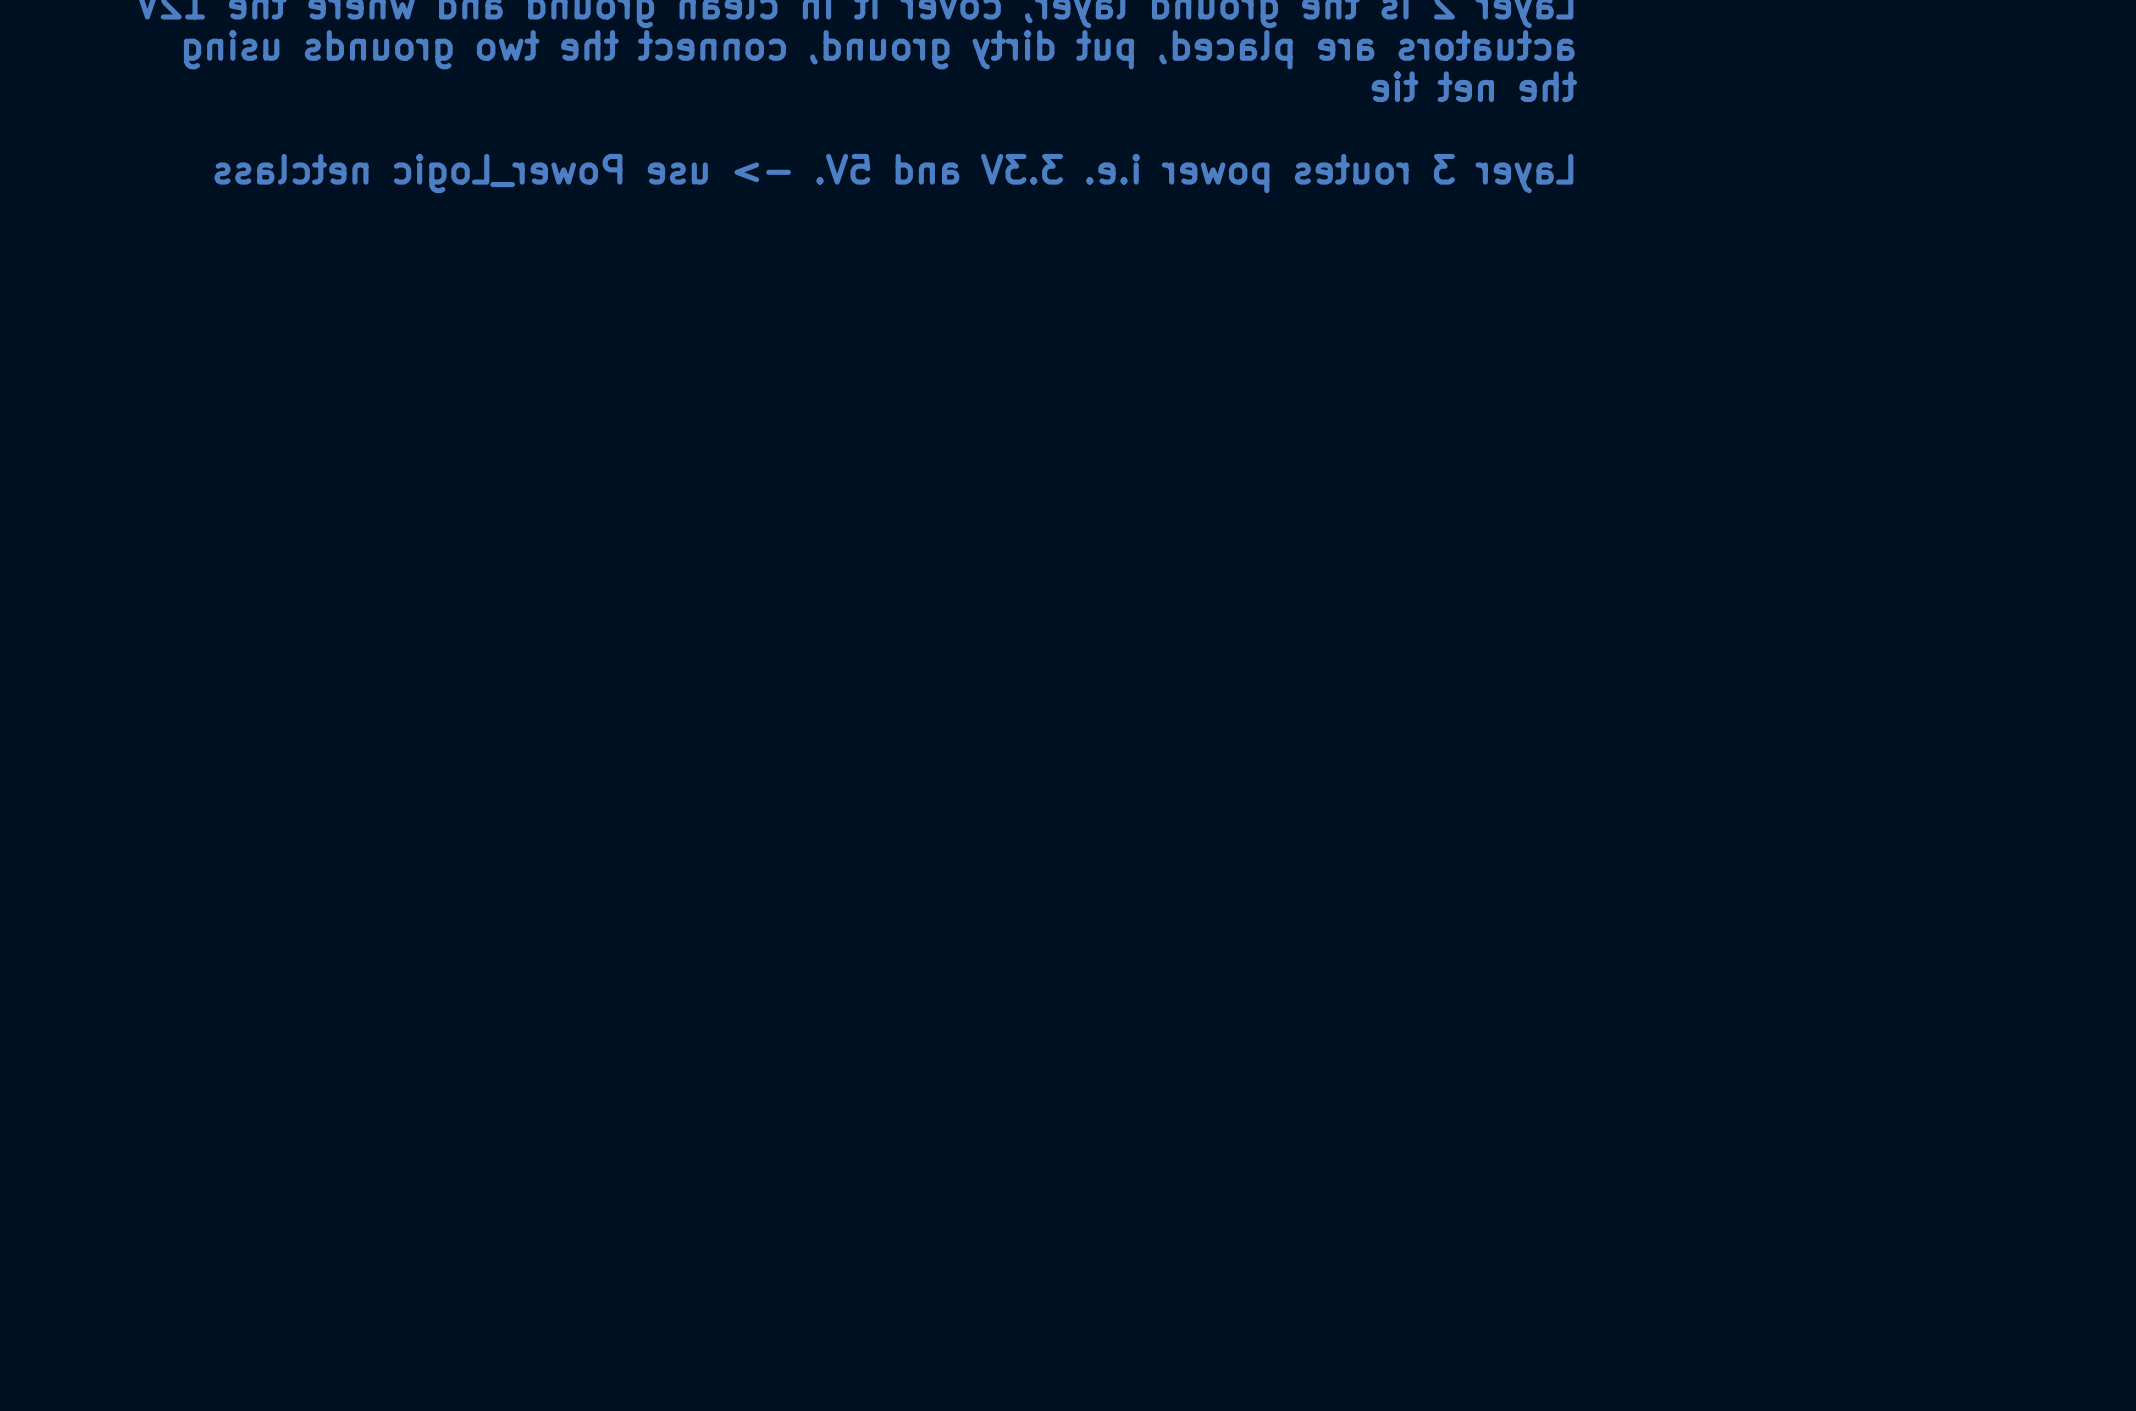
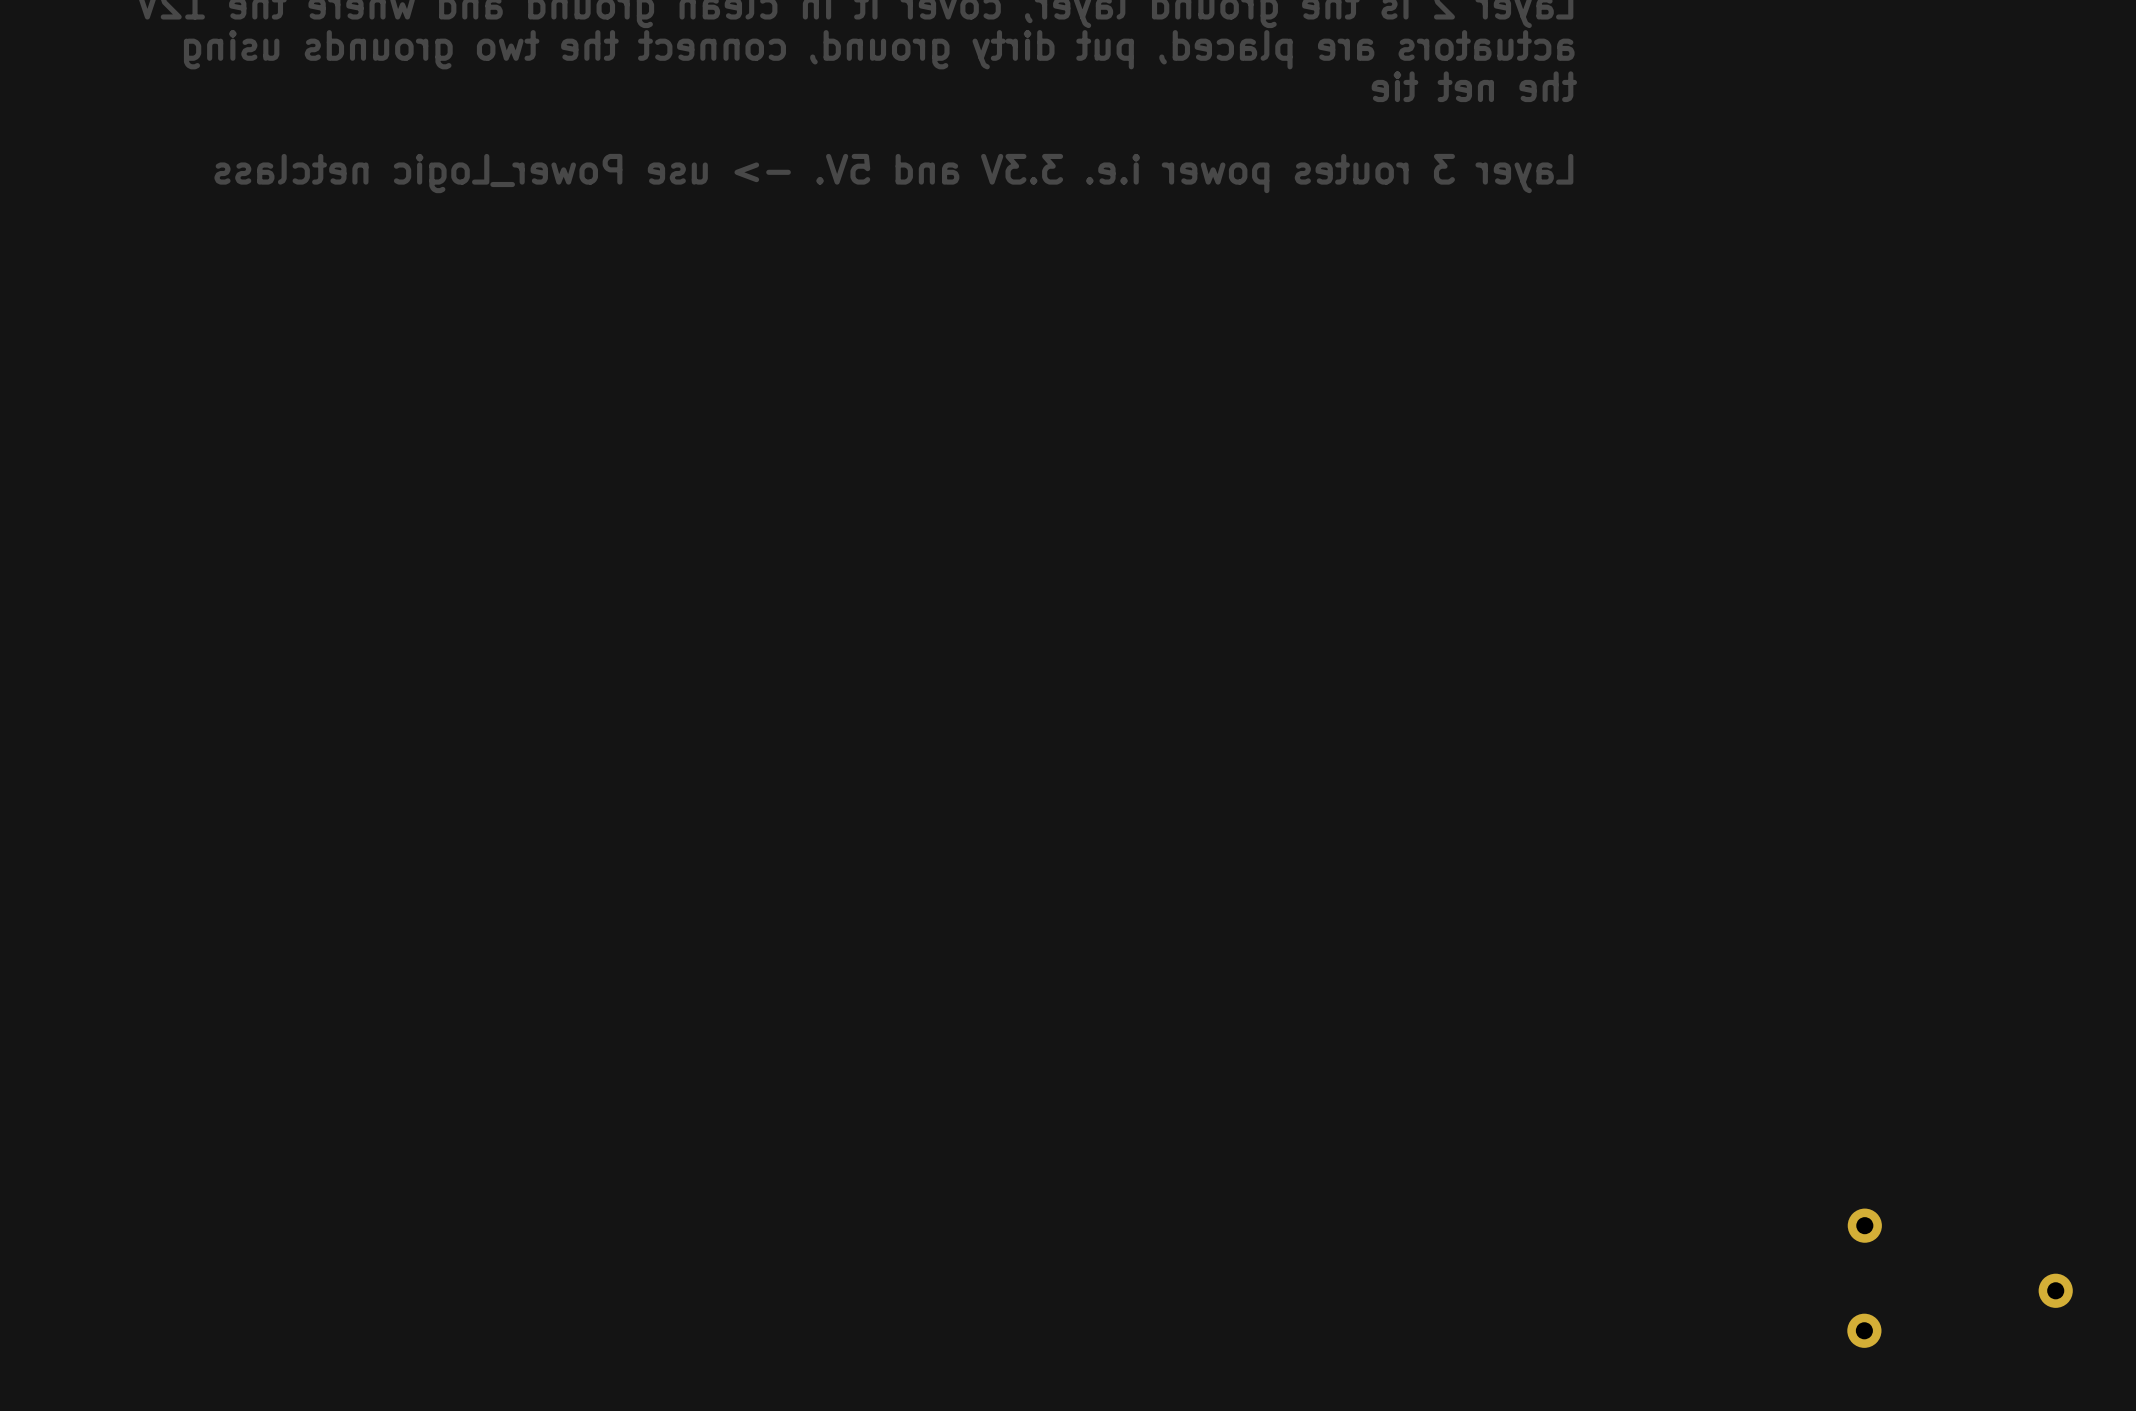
part: none -> (1864, 1225)
part: none -> (2055, 1290)
part: none -> (1864, 1330)

